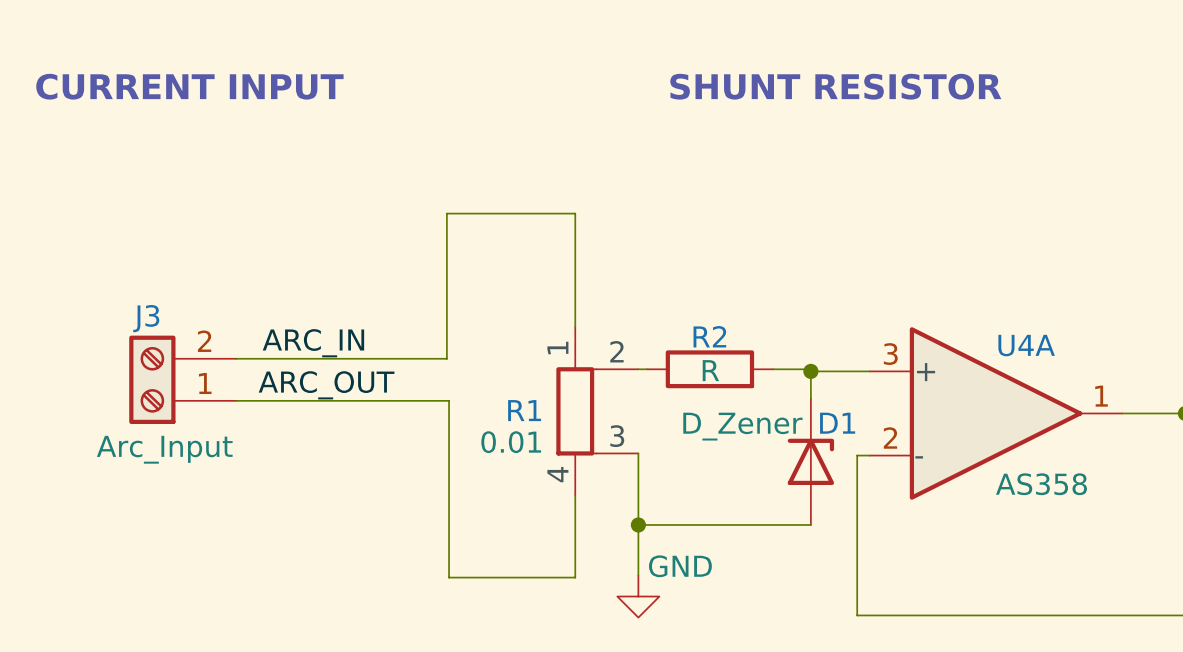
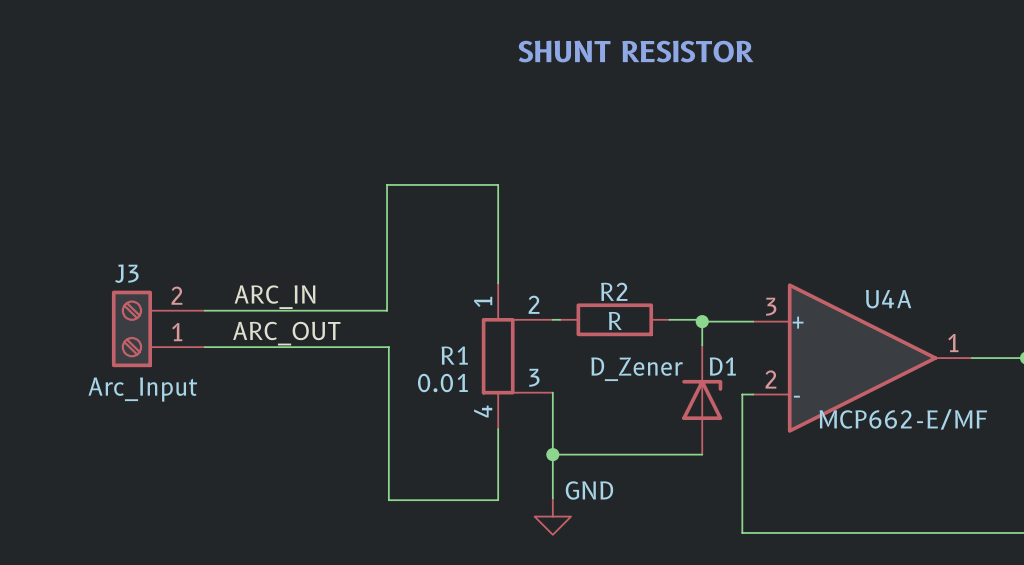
text: CURRENT INPUT (189, 86) -> none
text position: SHUNT RESISTOR (835, 86) -> SHUNT RESISTOR (636, 51)
U4A value: AS358 (1041, 484) -> MCP662-E/MF (903, 419)

